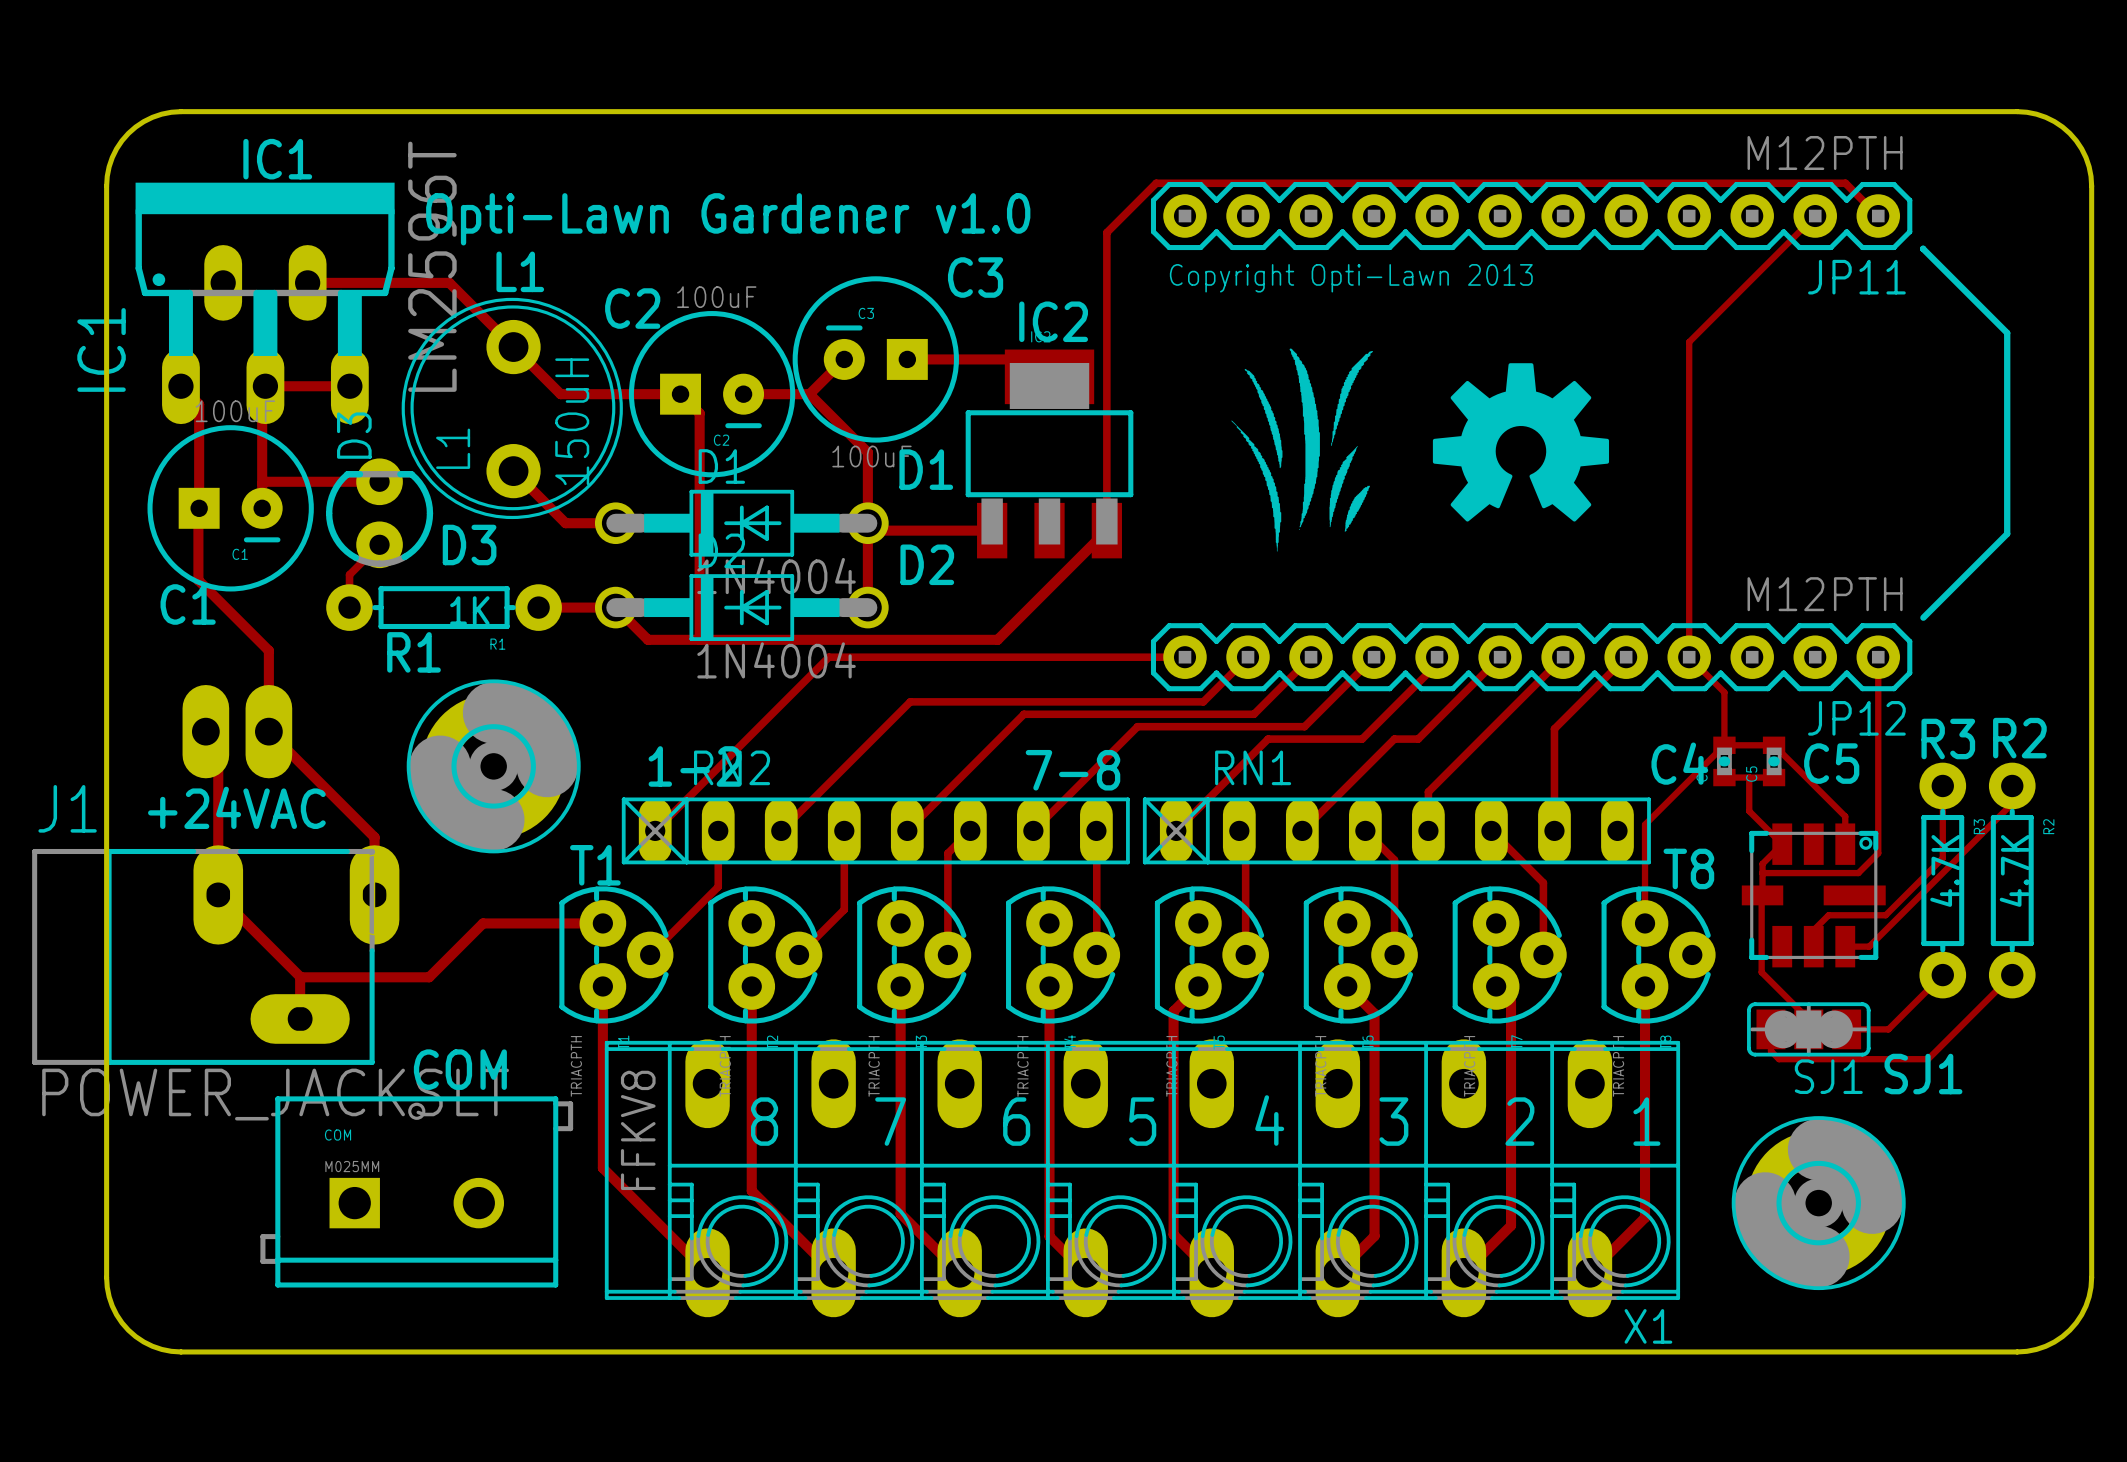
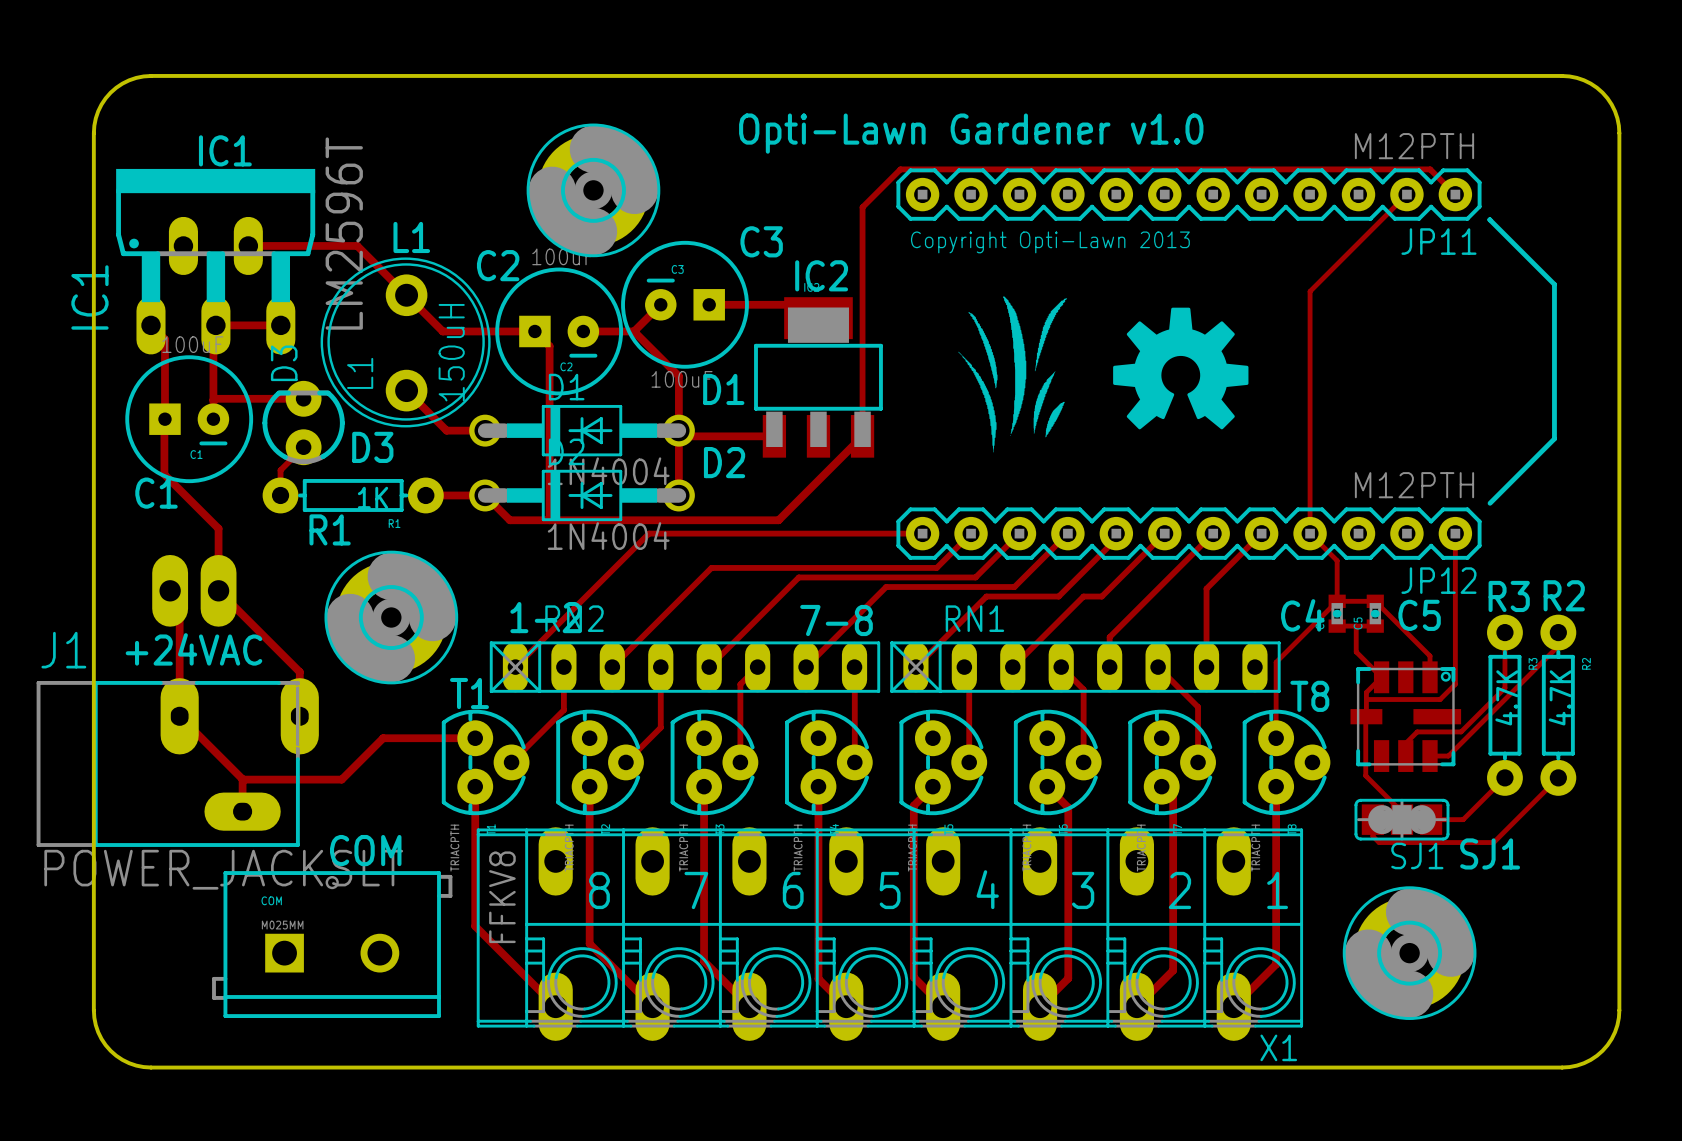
board edge: (106, 186) (112, 157) (128, 133) (152, 117) (181, 111) (2017, 111) (2045, 117) (2069, 133) (2086, 157) (2091, 186) -> (93, 171) (94, 125) (101, 104) (110, 92) (122, 83) (136, 77) (151, 75) (1562, 75) (1576, 77) (1590, 83) (1602, 92) (1611, 104) (1618, 125) (1619, 171)
part: none -> (593, 190)
text position: Opti-Lawn Gardener v1.0 (728, 219) -> Opti-Lawn Gardener v1.0 (971, 133)

